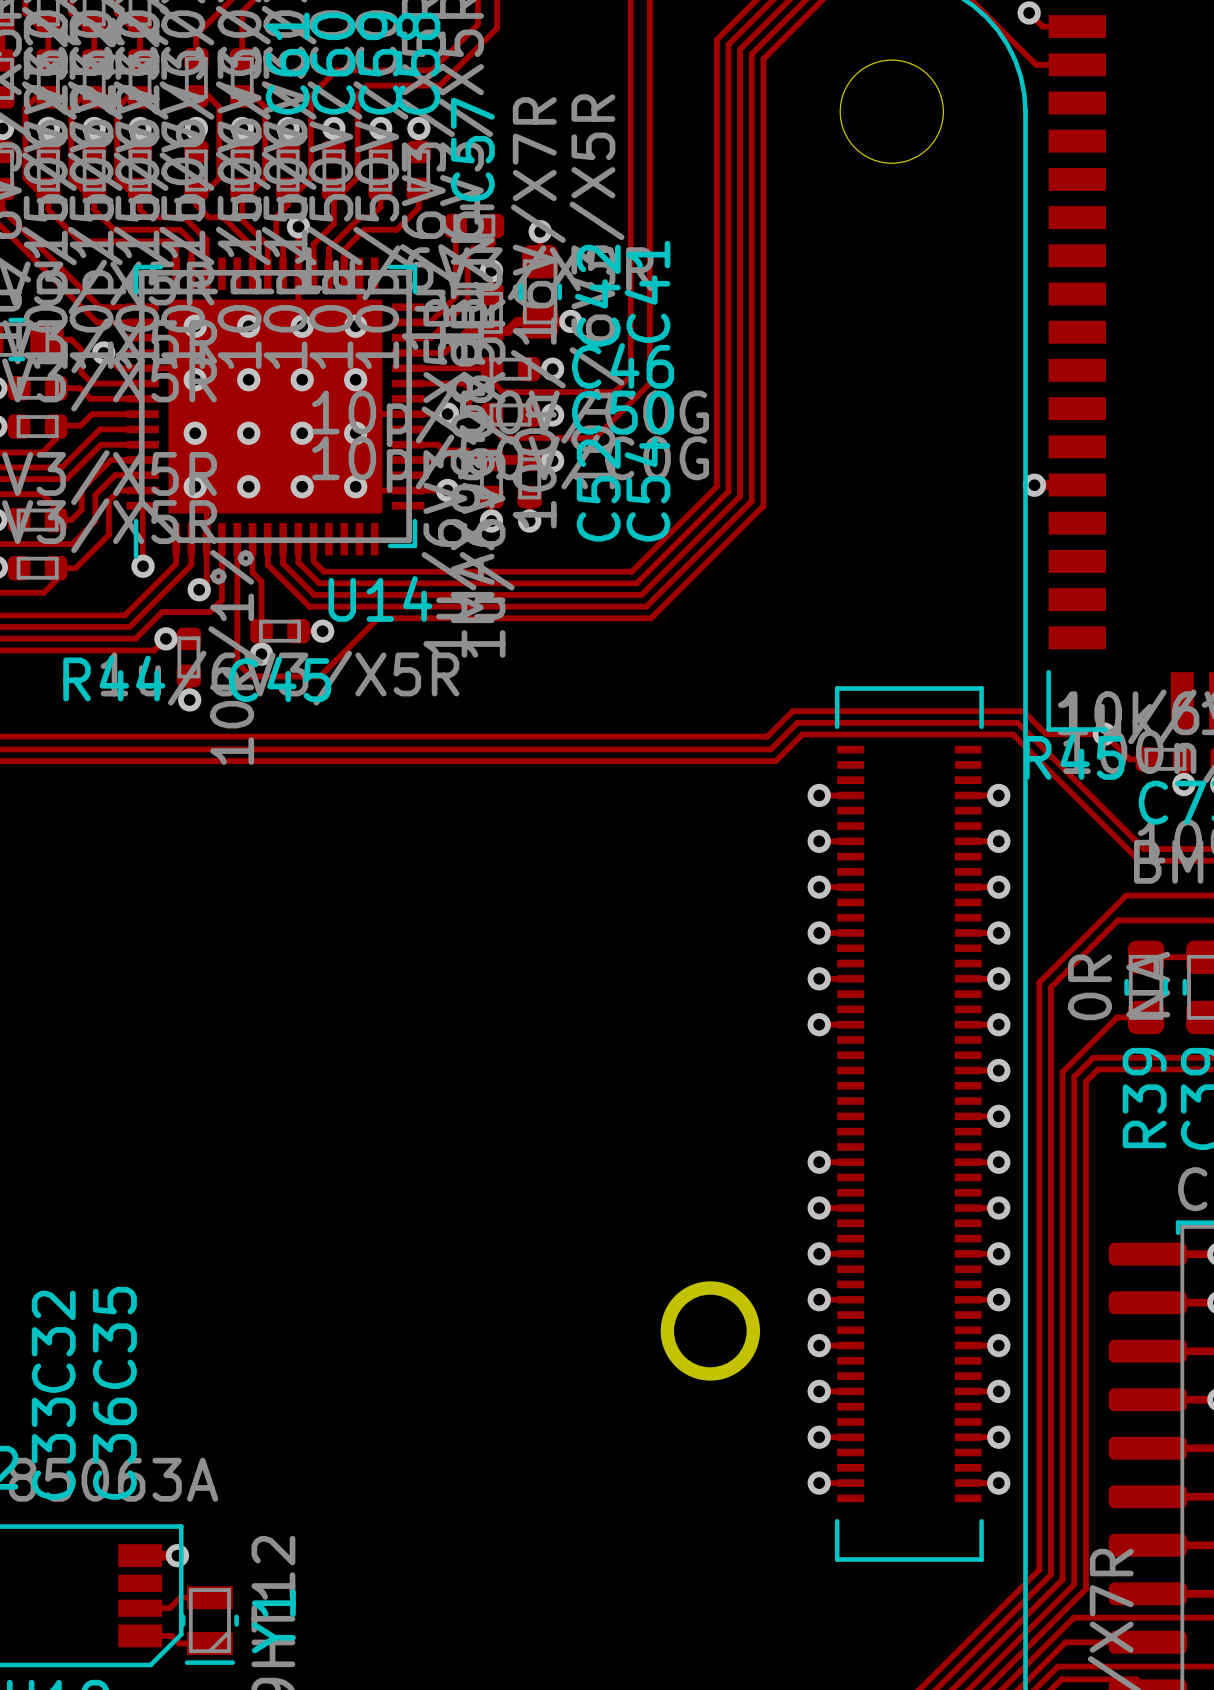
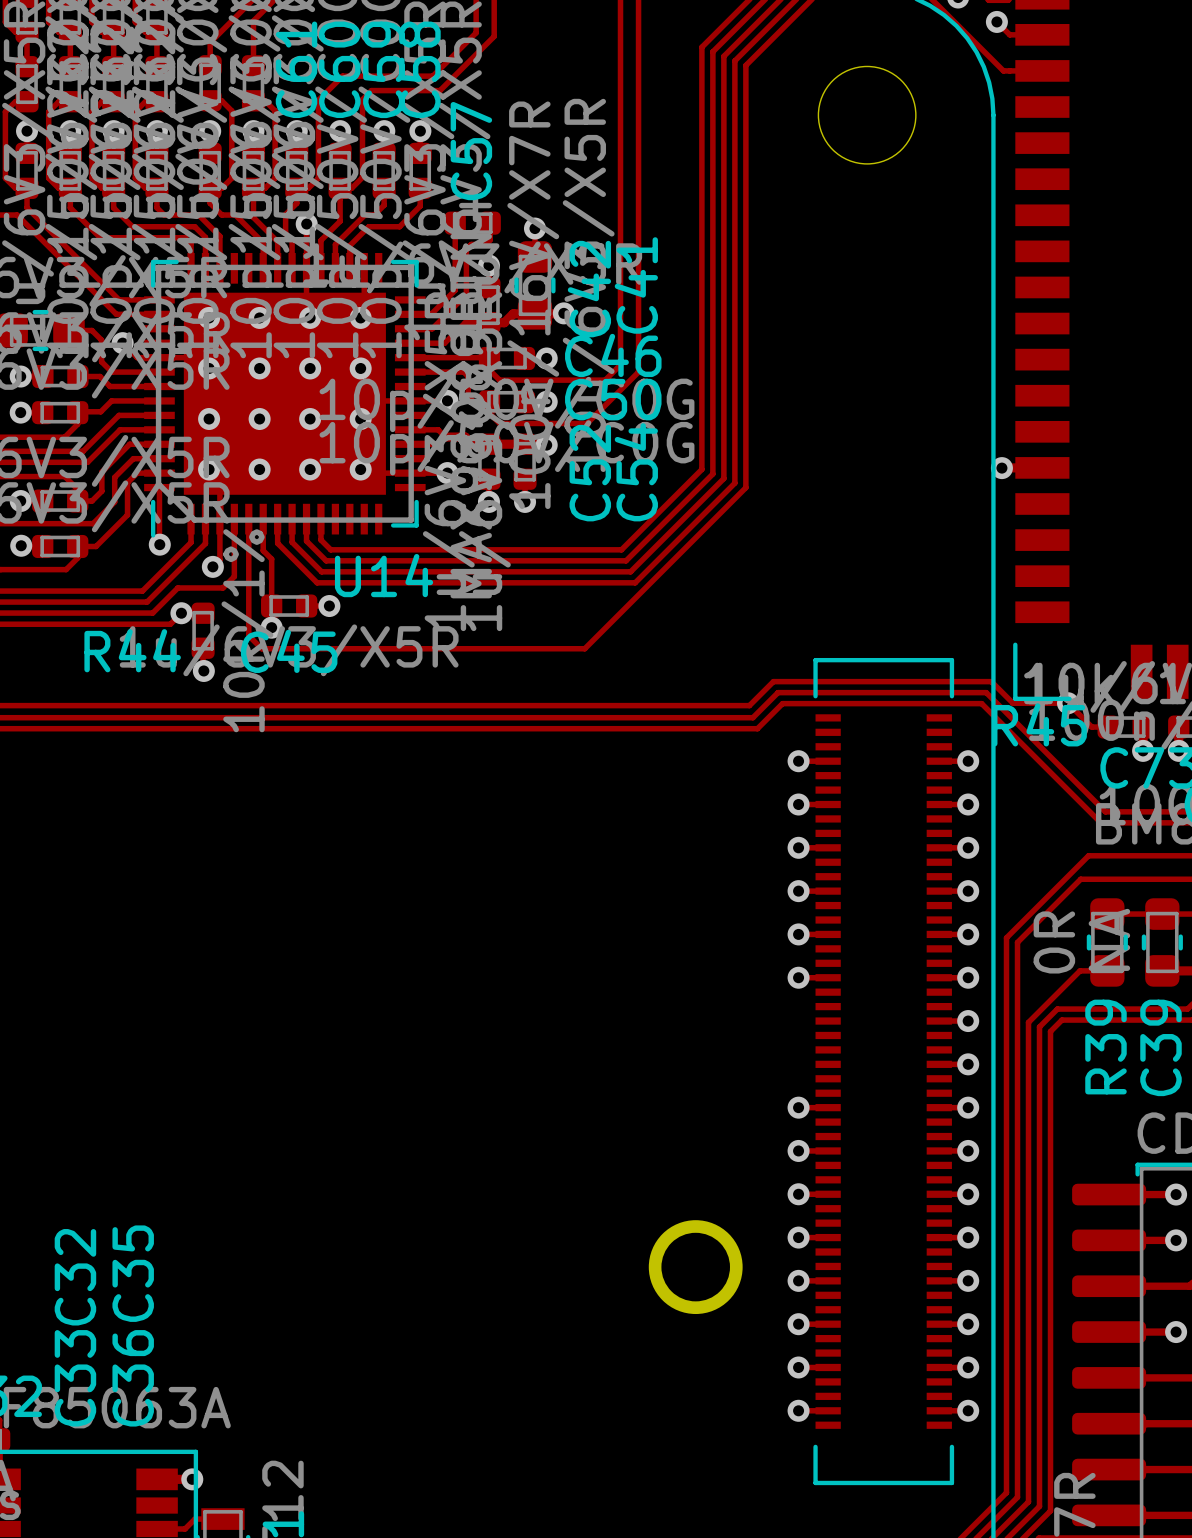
track: (651, 618) (378, 618) (320, 676) -> (639, 593) (584, 648) (326, 648)

